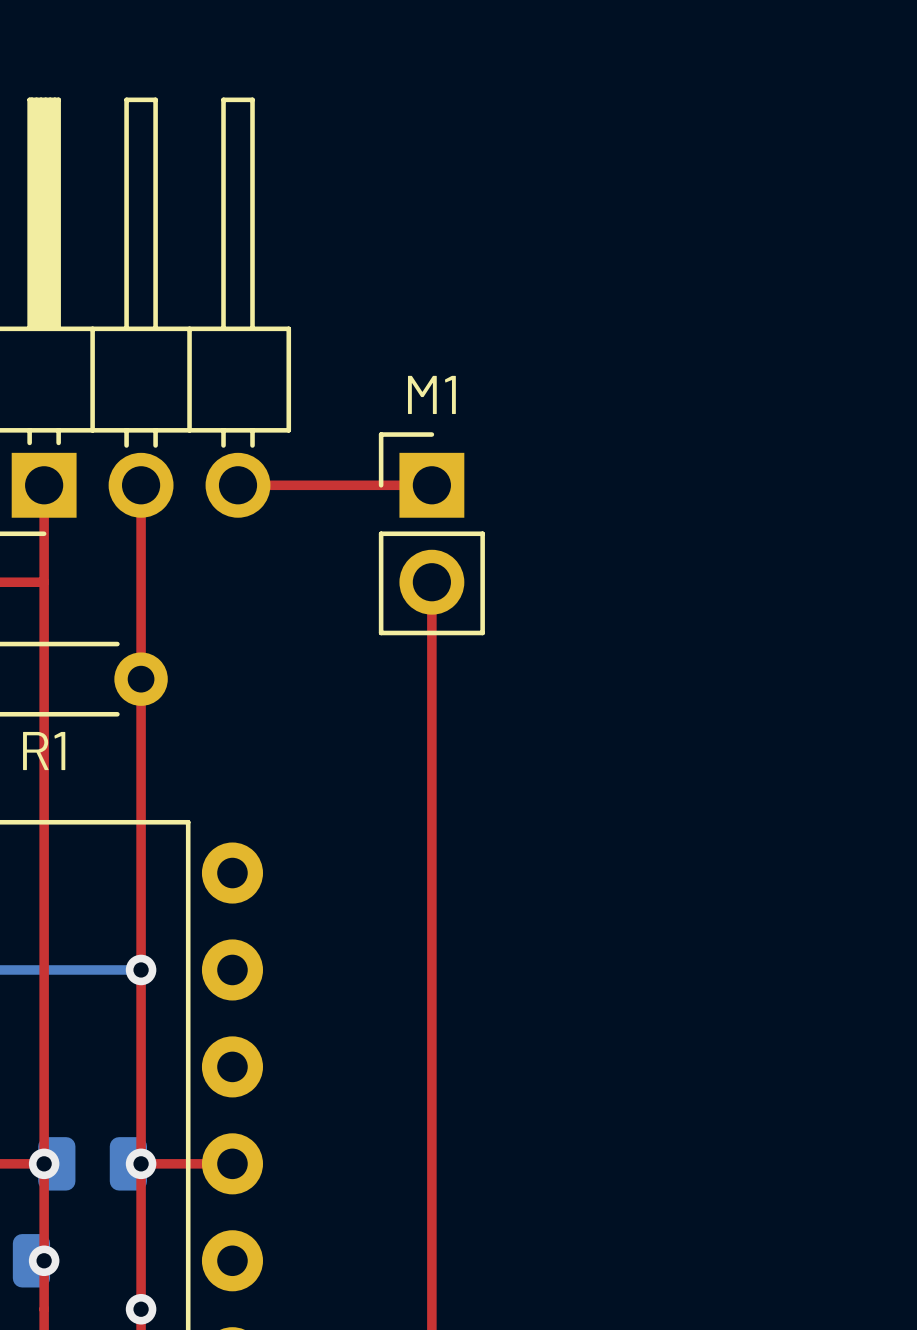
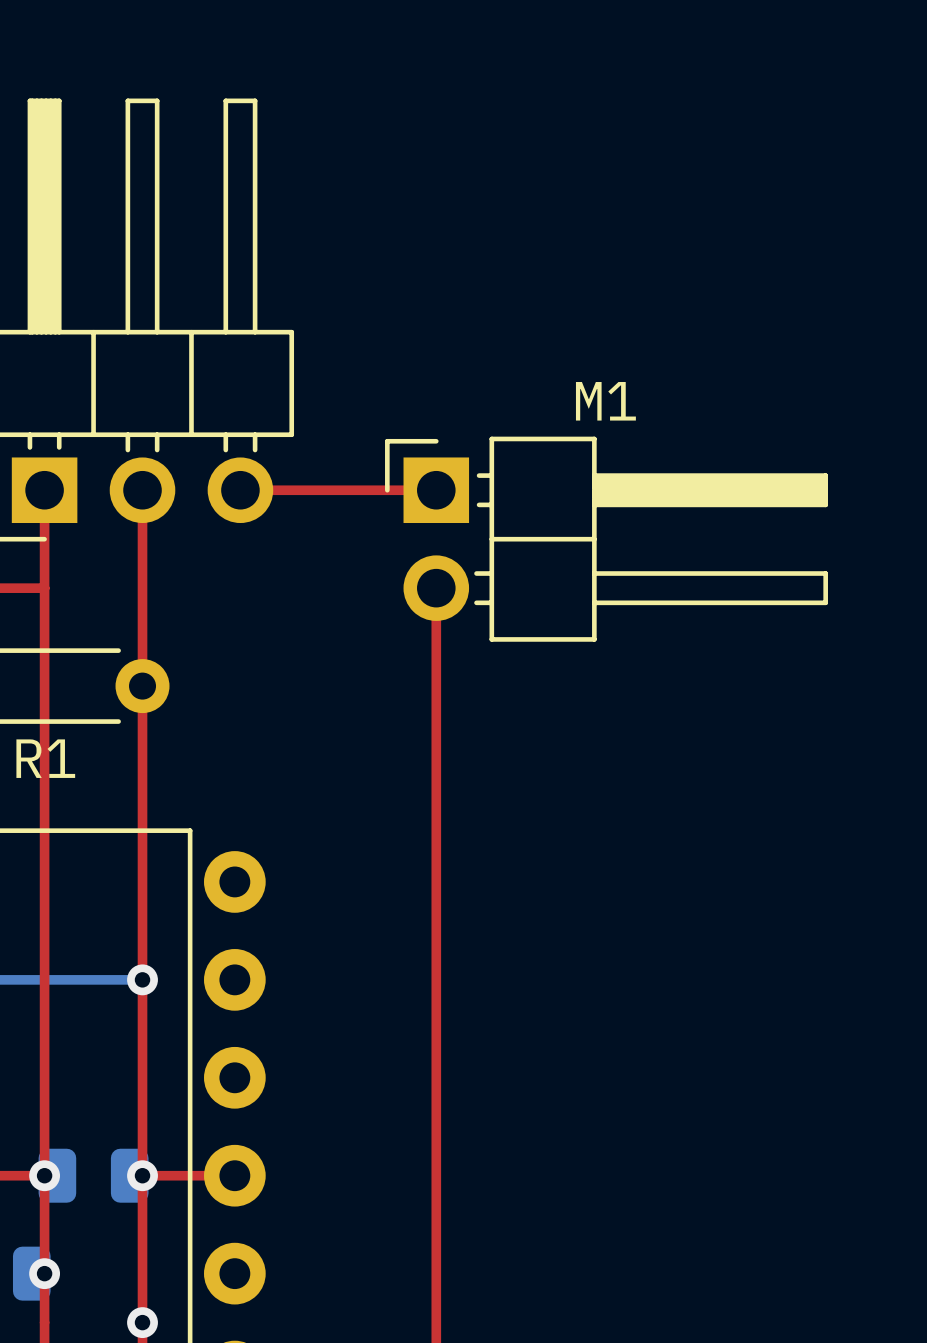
M1 footprint: [378, 432, 485, 636] -> [385, 436, 828, 642]

